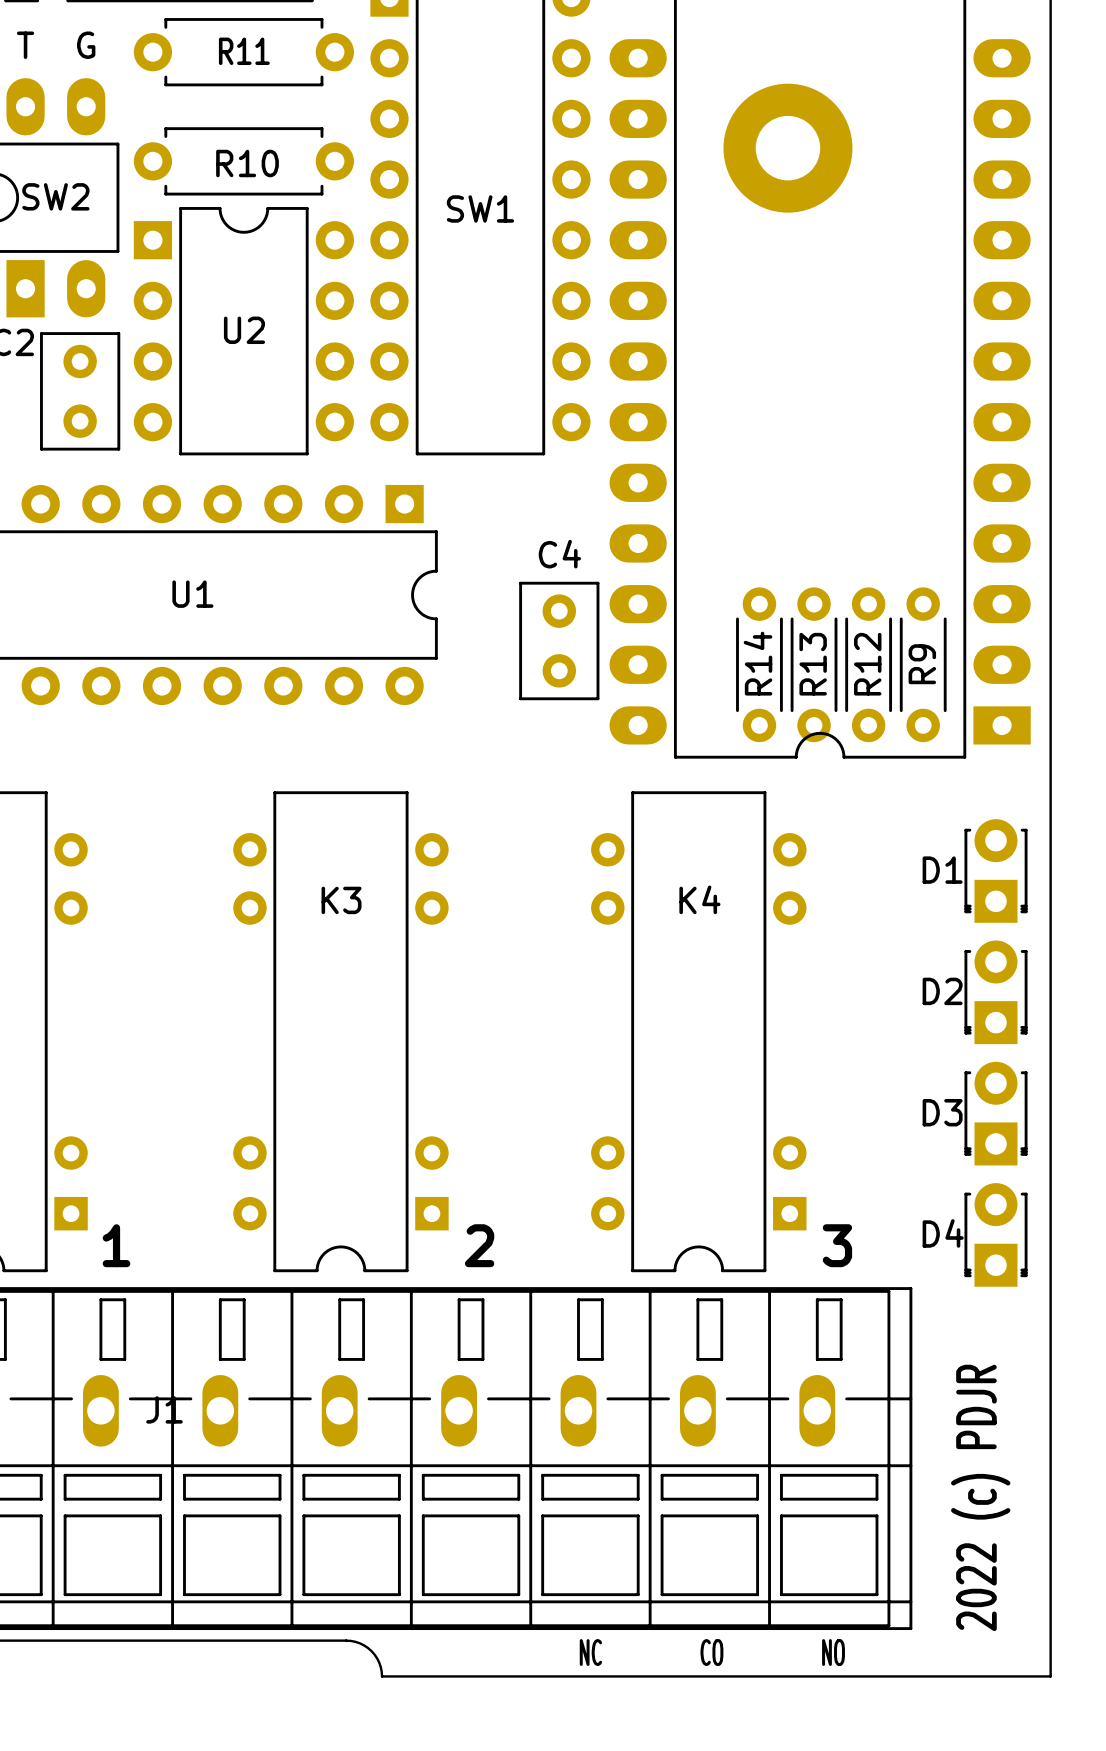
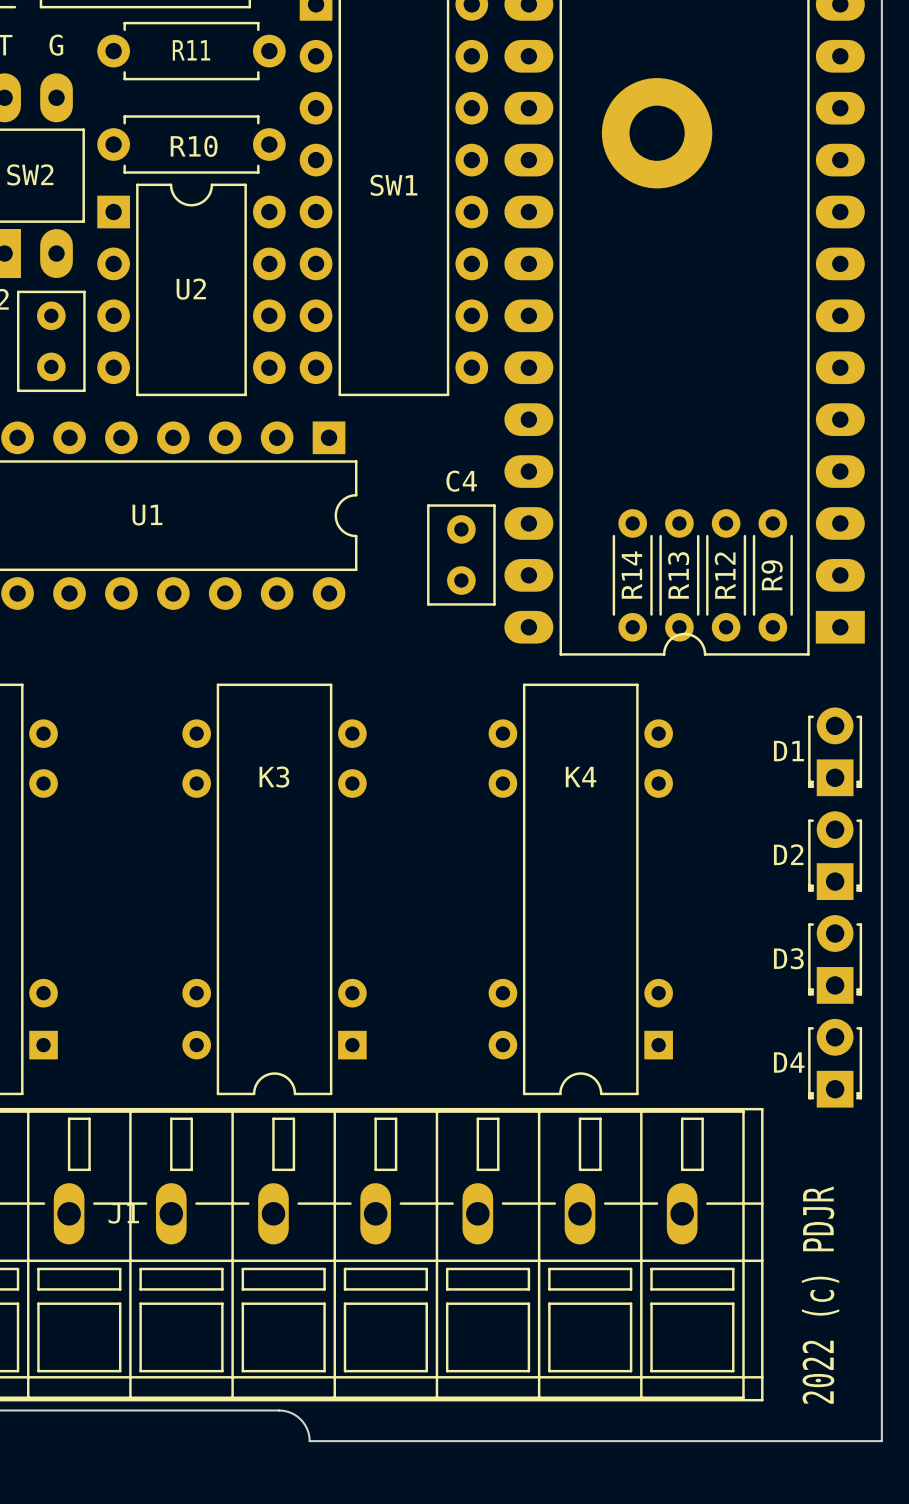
text: 1 (116, 1245) -> none
text: 2 (479, 1245) -> none
text: 3 (837, 1245) -> none
text: NC (590, 1652) -> none
text: CO (711, 1652) -> none
text: NO (833, 1652) -> none

